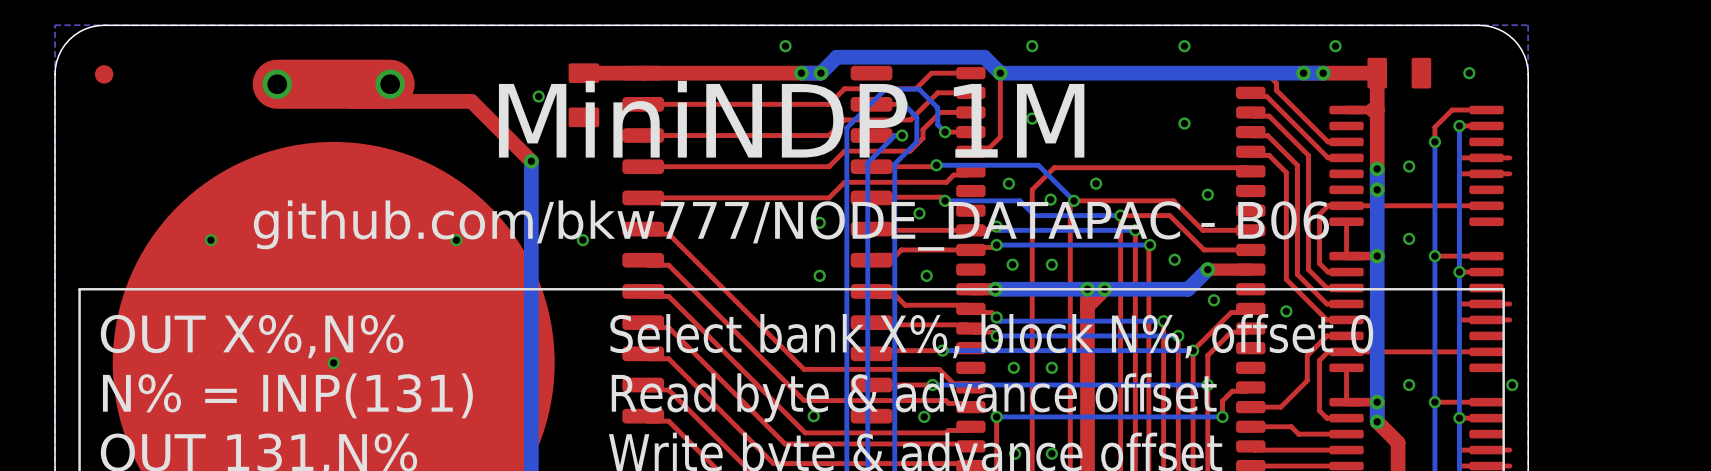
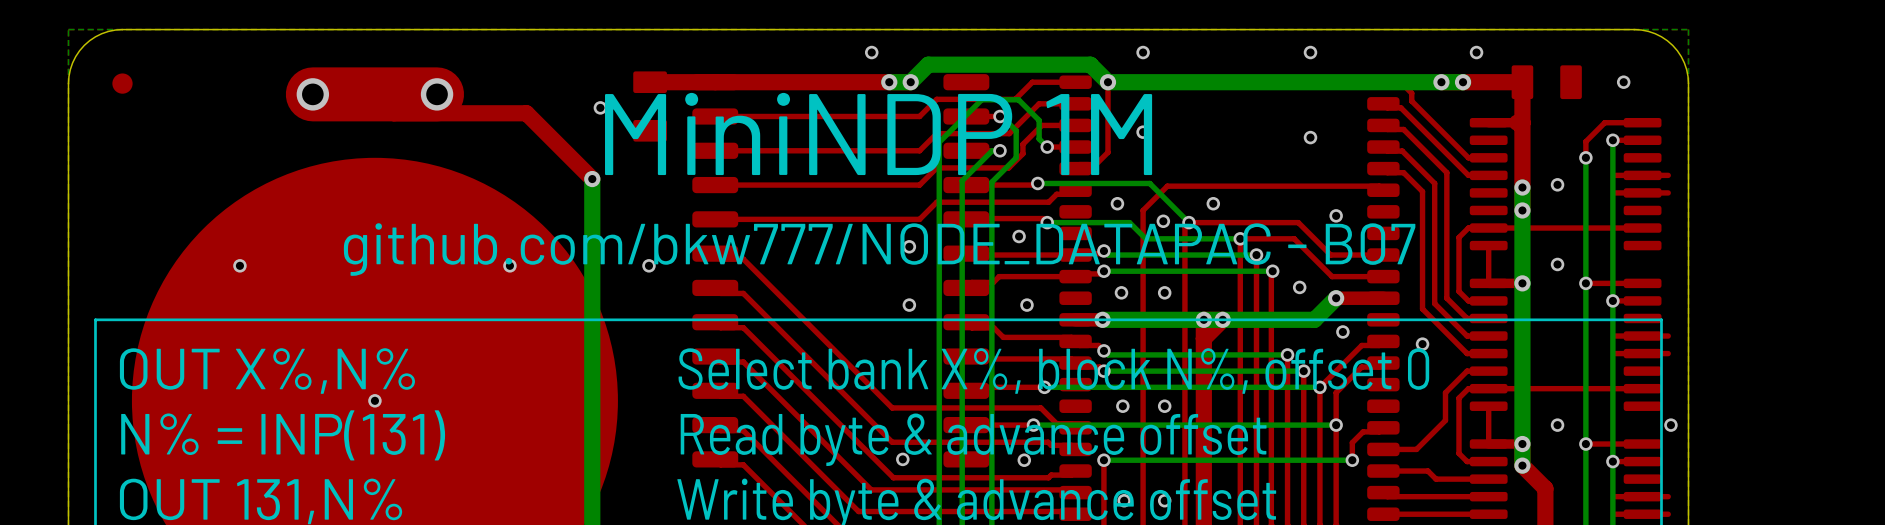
text: github.com/bkw777/NODE_DATAPAC - B06 (791, 225) -> github.com/bkw777/NODE_DATAPAC - B07 (879, 249)

